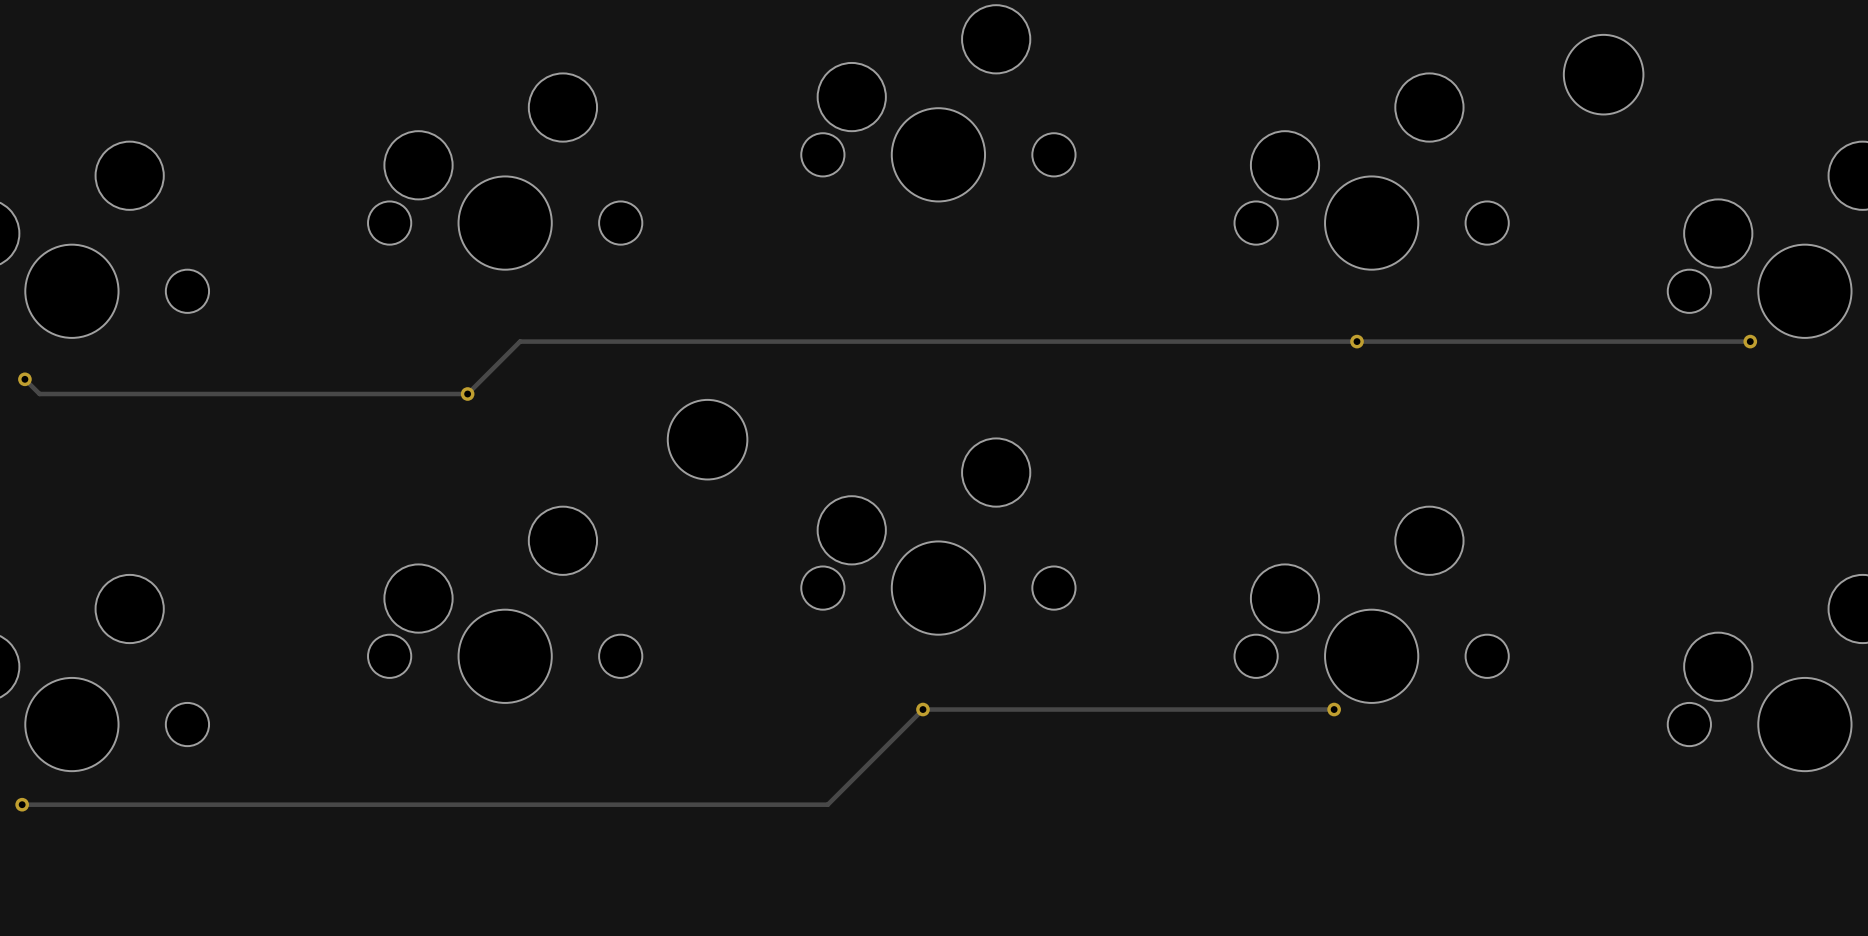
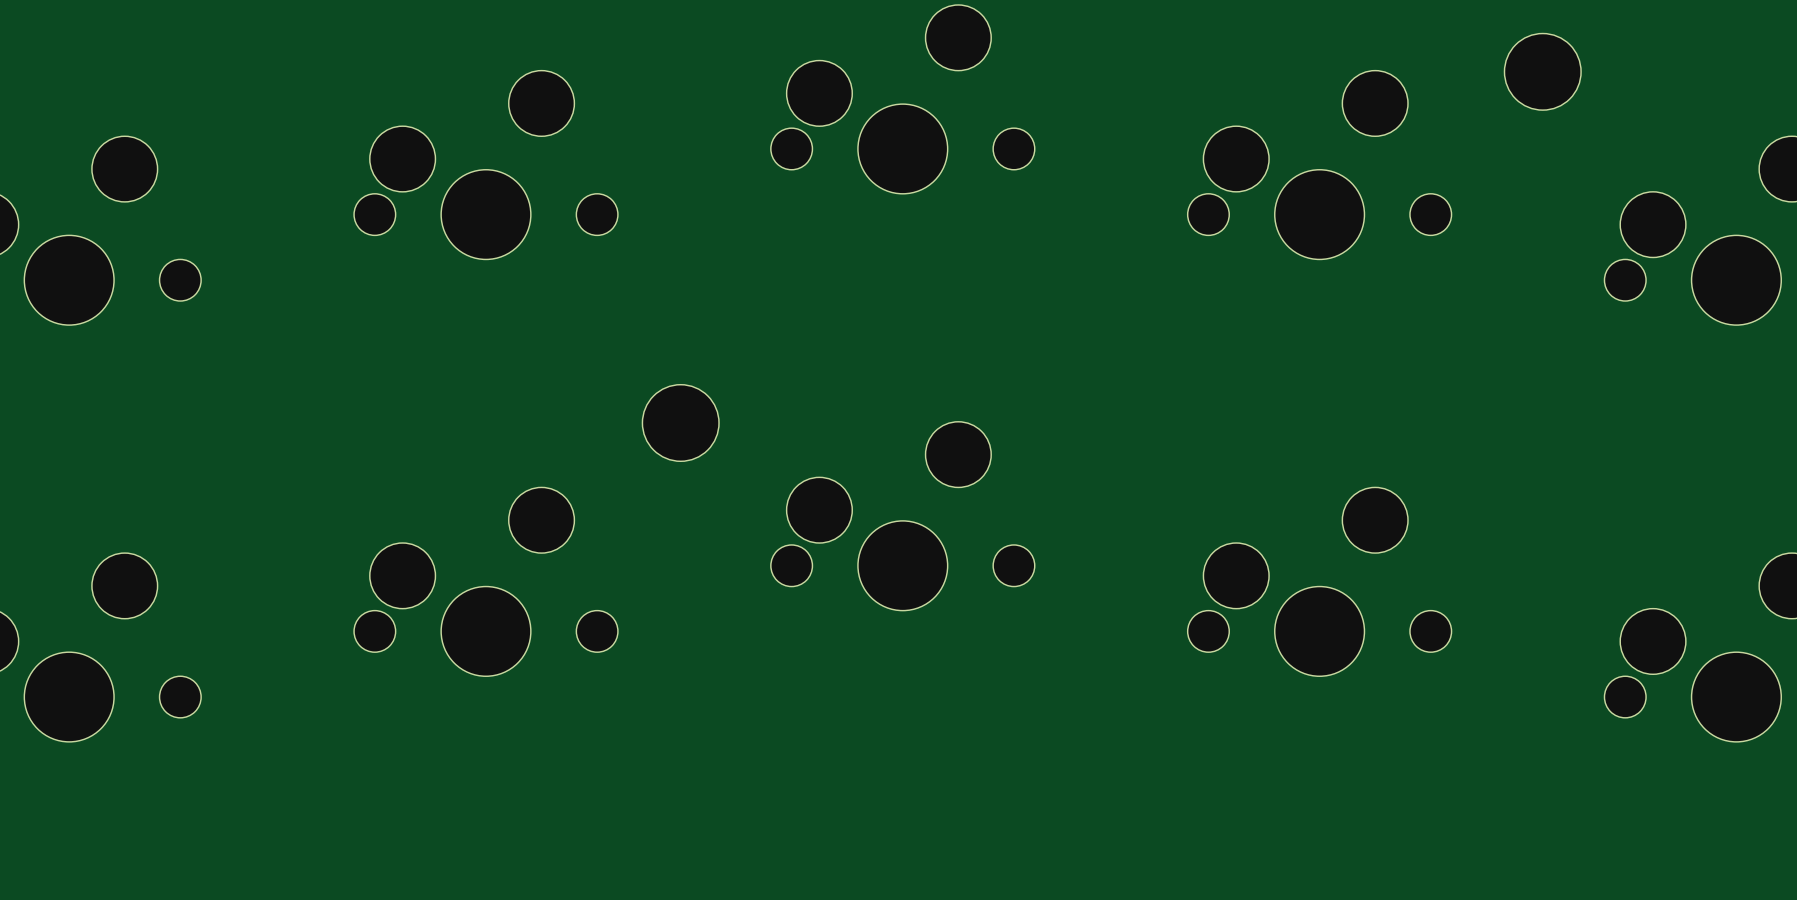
via: (1357, 341) -> none
track: (1750, 341) (520, 341) (467, 394) (39, 394) (24, 379) -> none
via: (1750, 341) -> none
via: (24, 379) -> none
via: (467, 394) -> none
via: (922, 709) -> none
track: (1334, 709) (922, 709) (827, 804) (22, 804) -> none
via: (1334, 709) -> none
via: (22, 804) -> none

